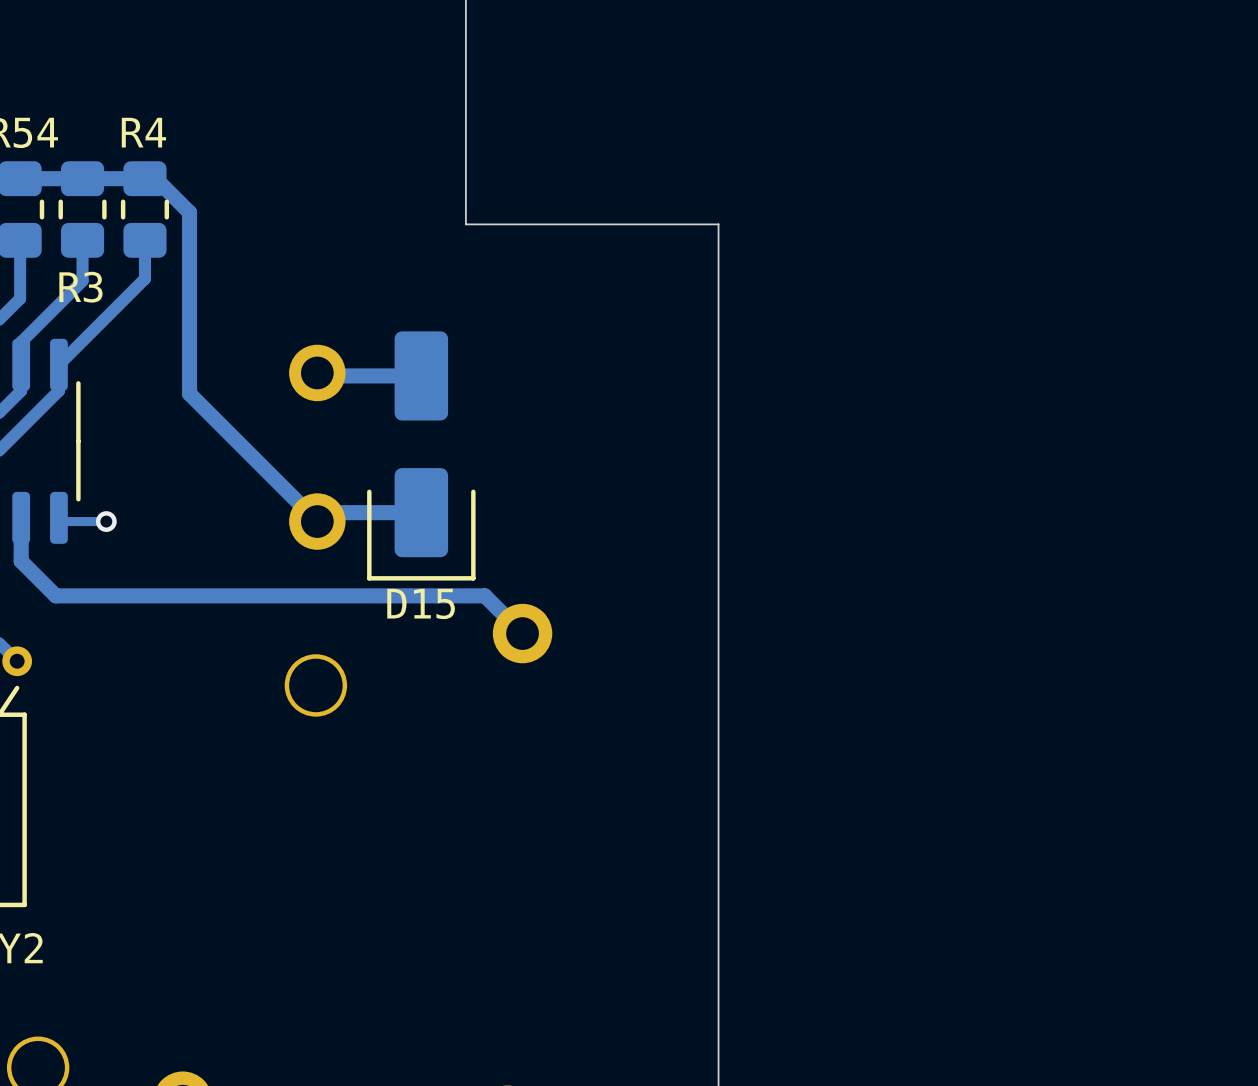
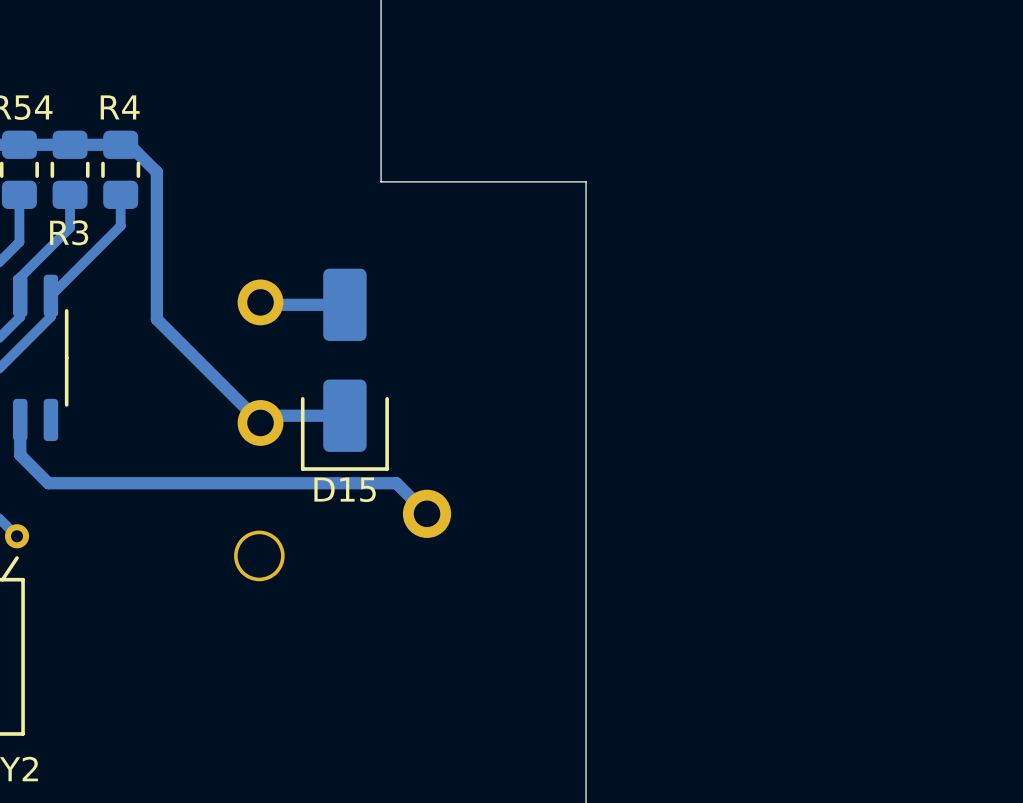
track: (58, 517) (62, 521) (106, 521) -> none
via: (106, 521) -> none

